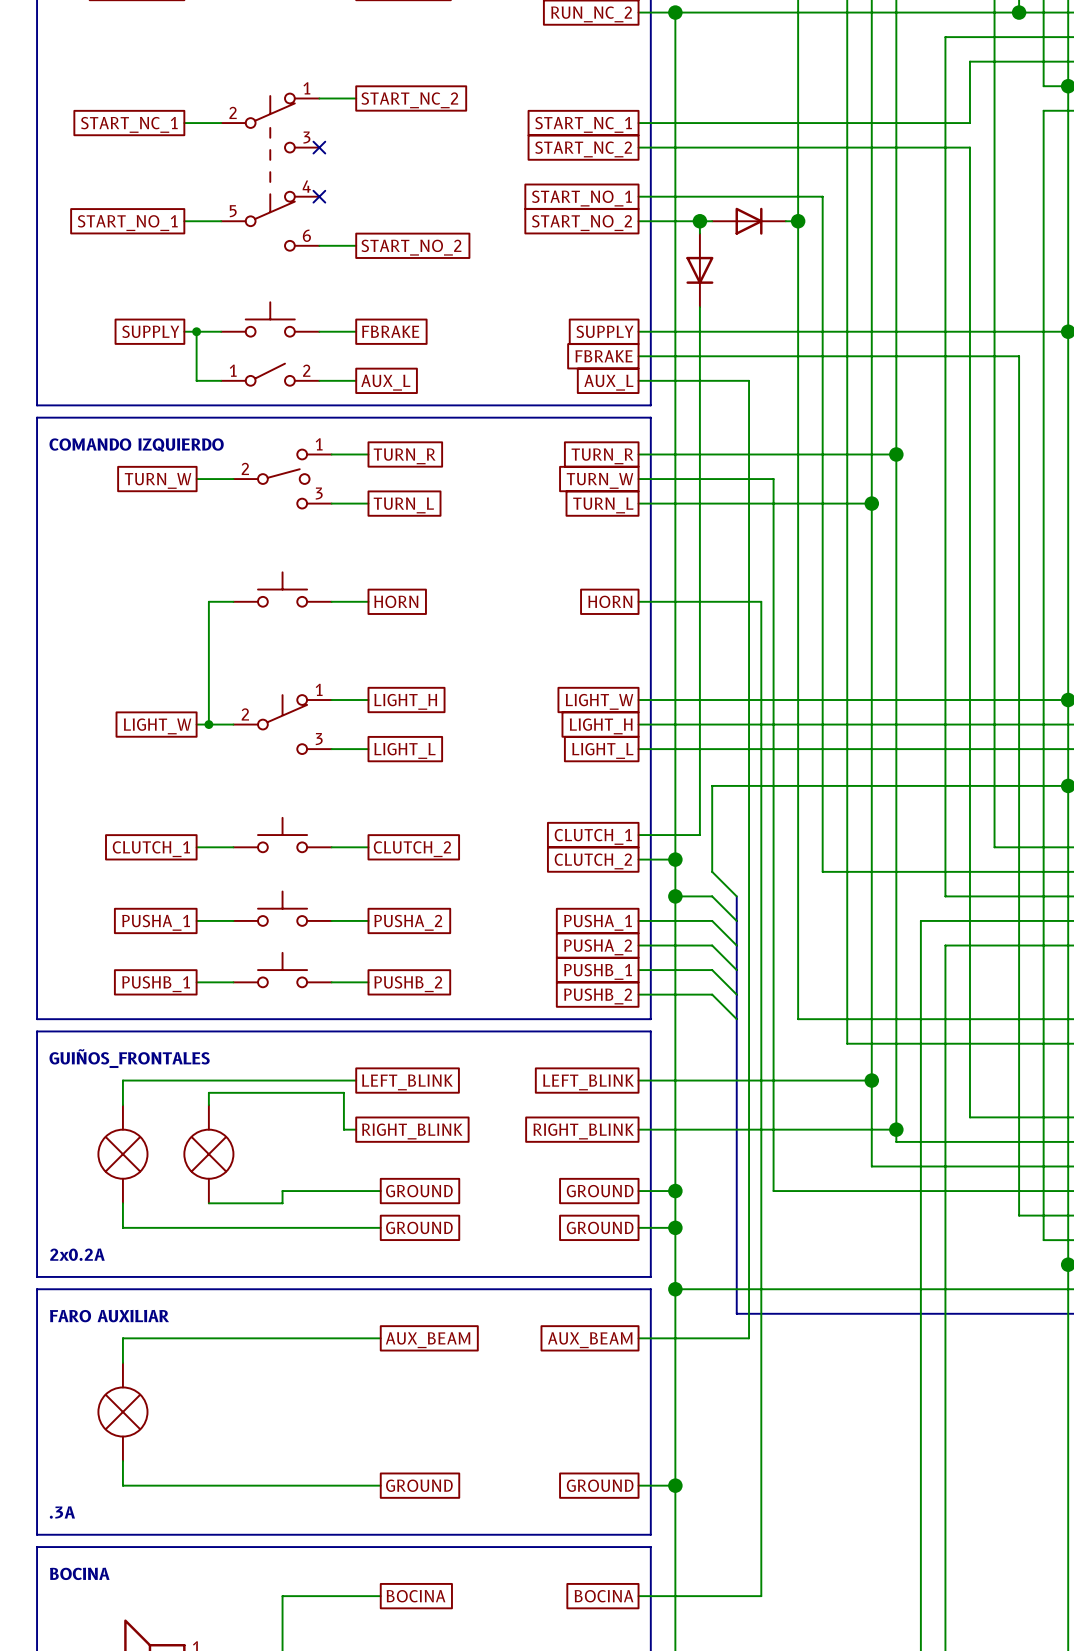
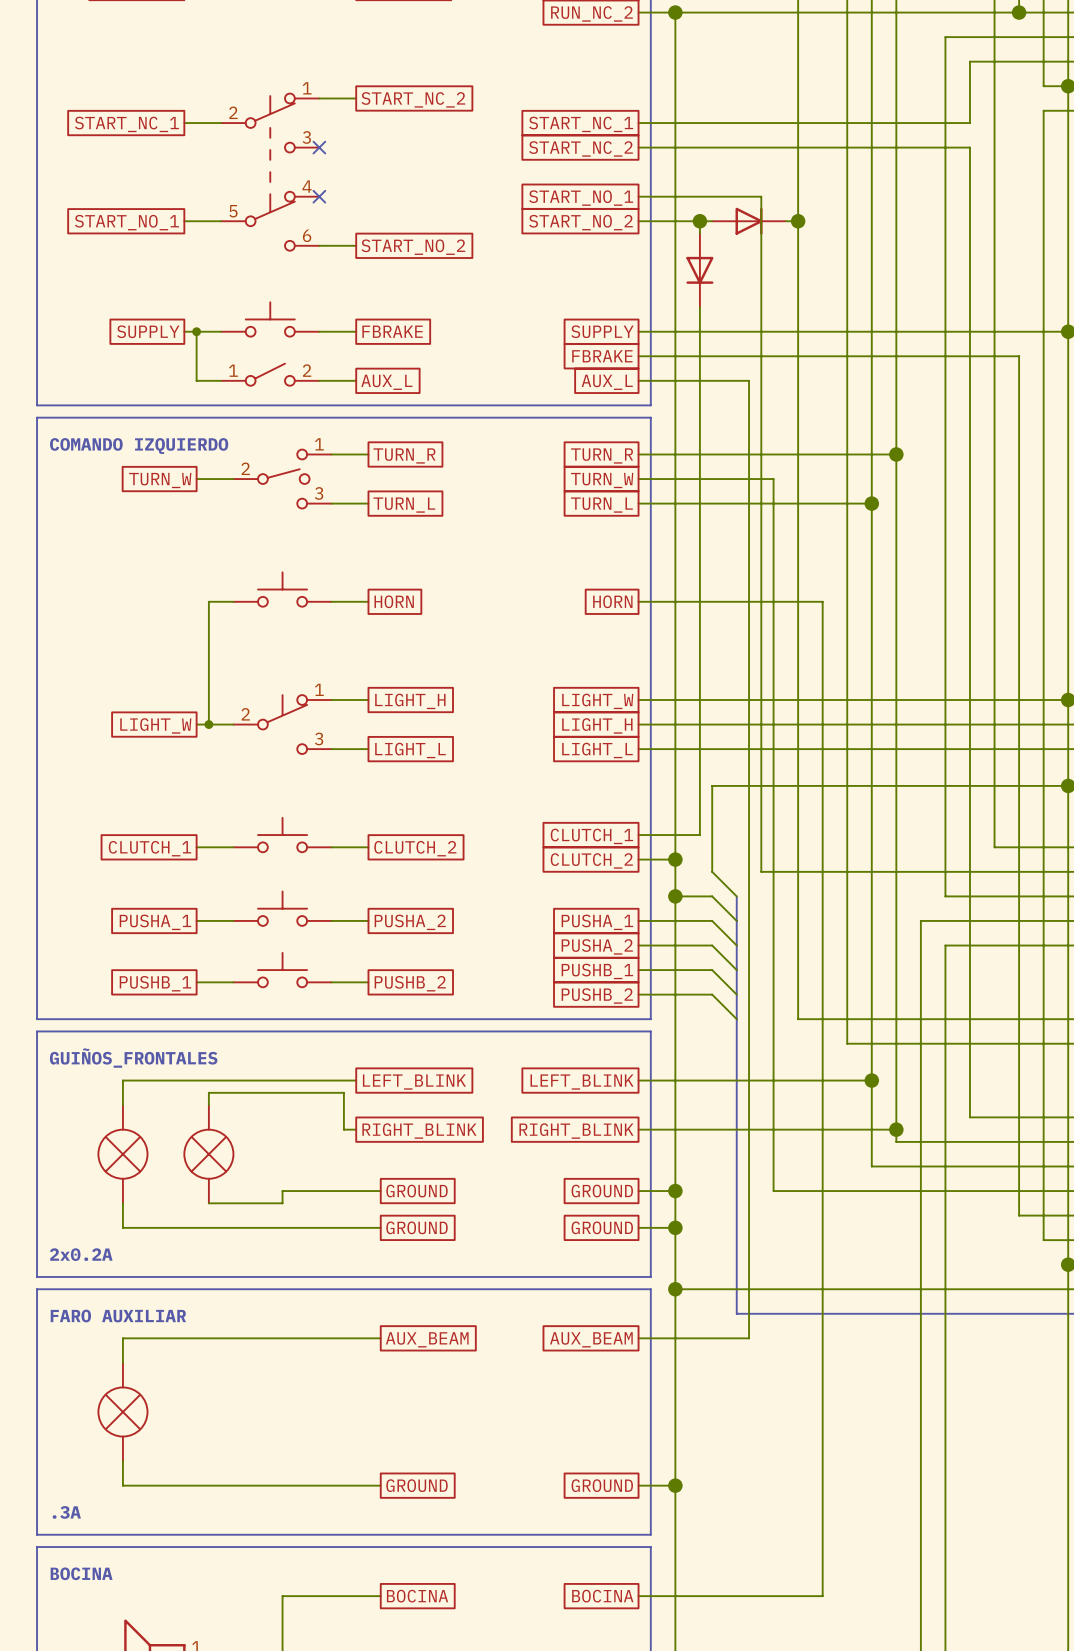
wire: (761, 196) (822, 196) (822, 601) -> (761, 196) (761, 601) (822, 601)
wire: (761, 871) (761, 1596) -> (761, 871) (822, 871) (822, 1596) (761, 1596)

